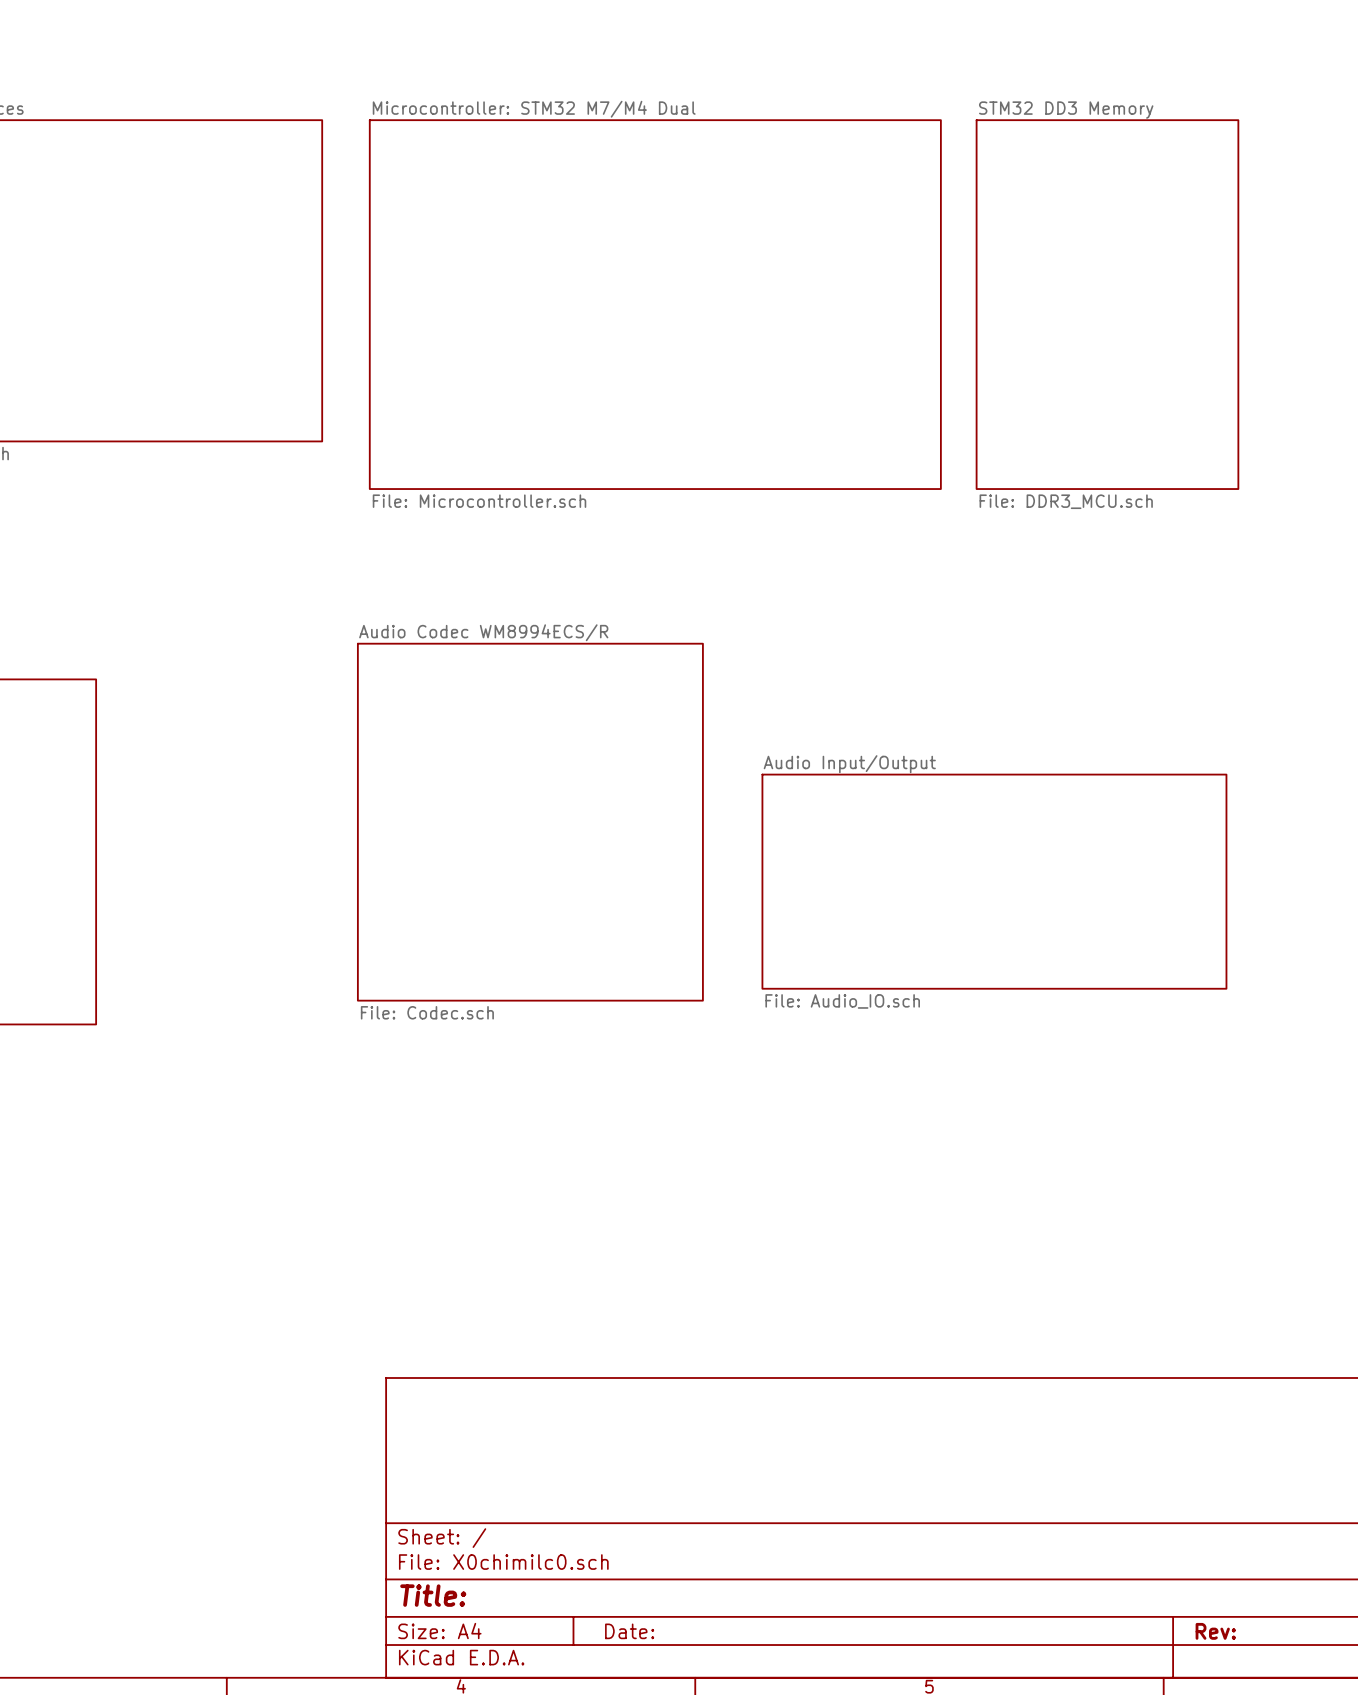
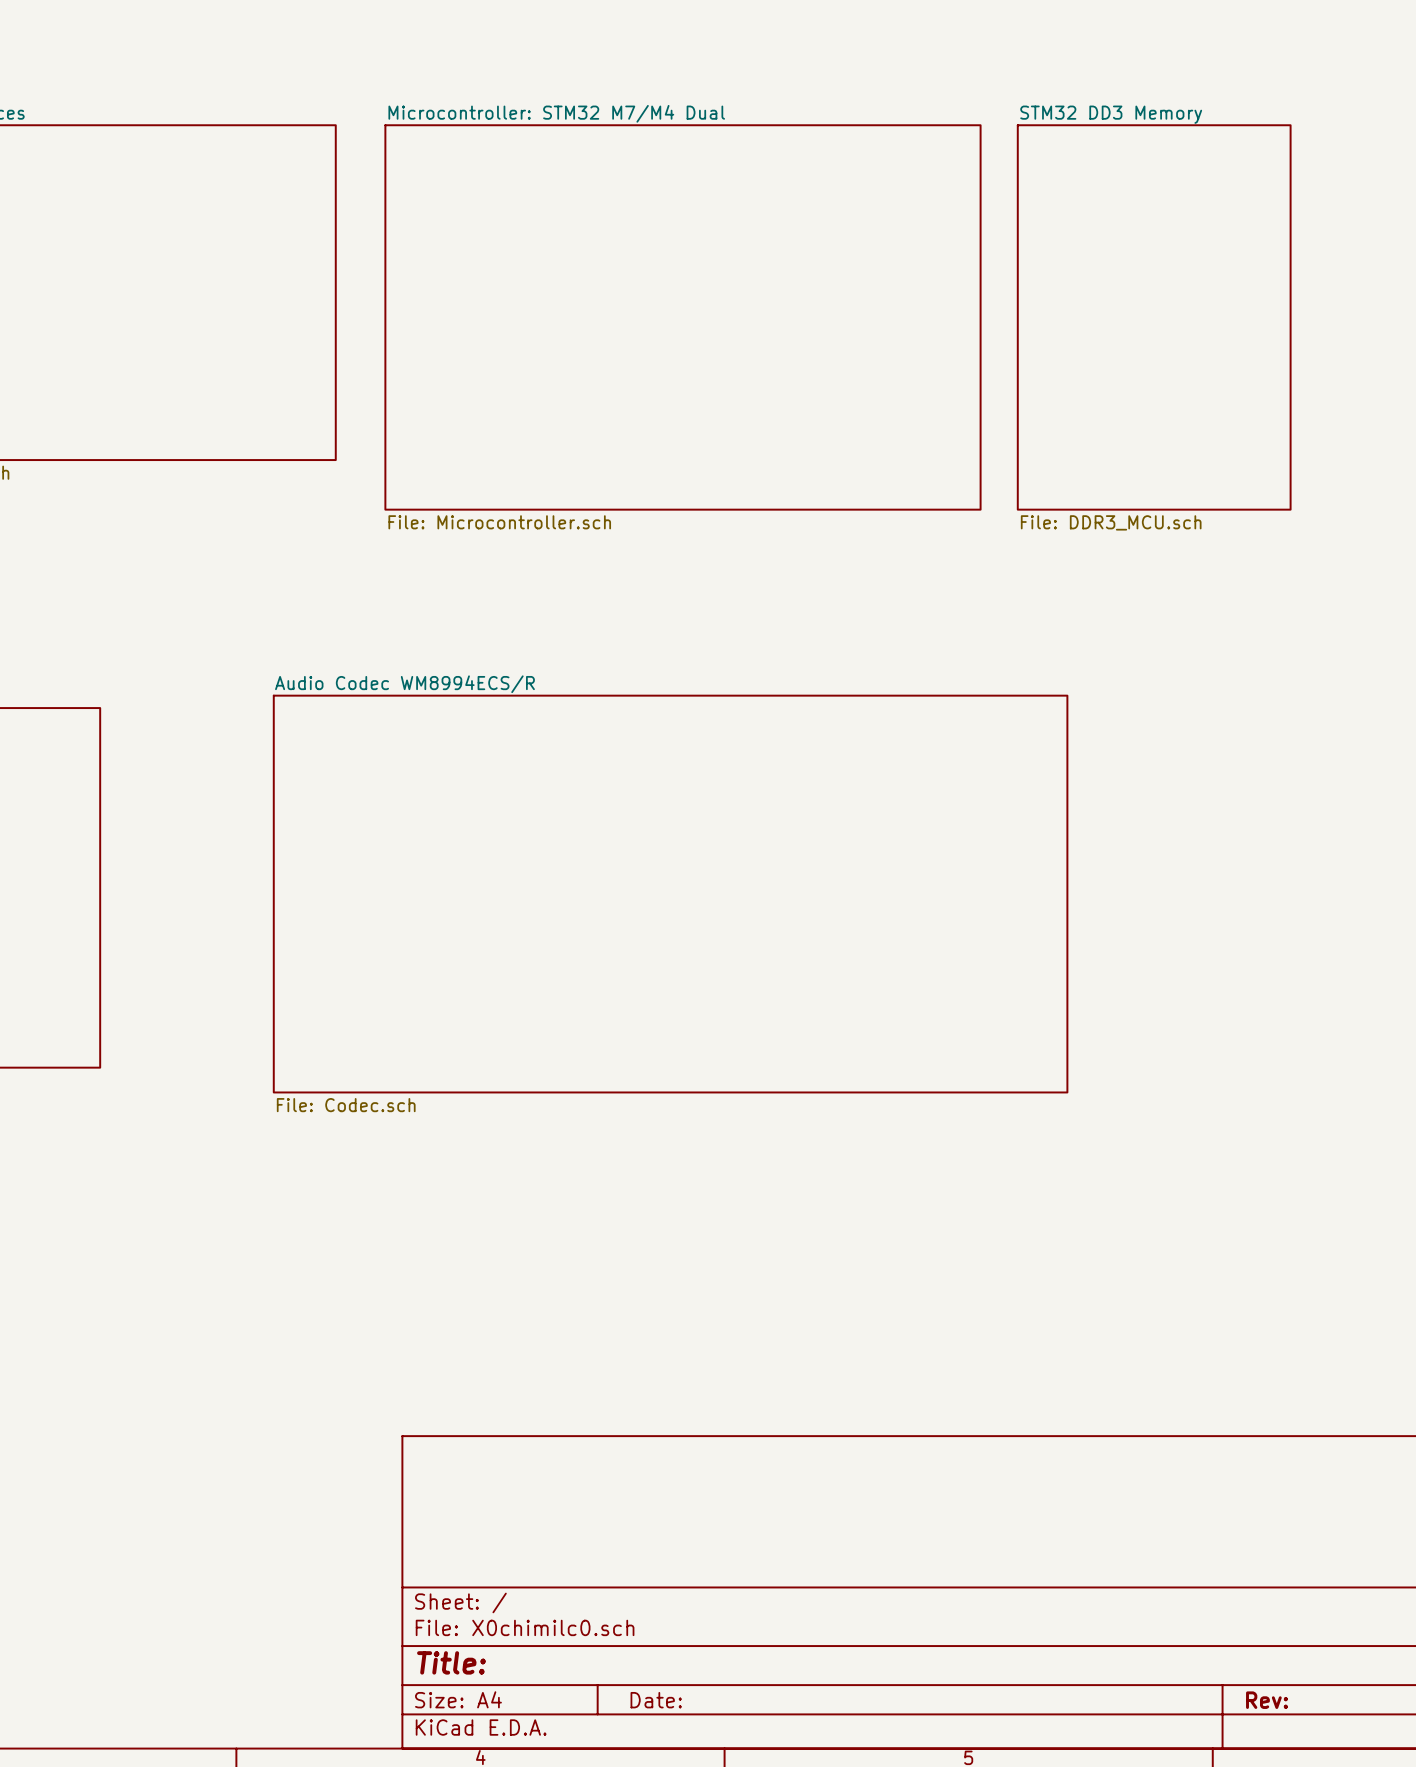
sheet Audio Codec WM8994ECS/R name position: Audio Codec WM8994ECS/R (483, 632) -> Audio Codec WM8994ECS/R (404, 684)
sheet Audio Codec WM8994ECS/R shape: [357, 643, 703, 1001] -> [273, 695, 1068, 1093]
sheet Audio Input/Output: File: Audio_IO.sch (994, 881) -> none
sheet Audio Codec WM8994ECS/R value position: File: Codec.sch (427, 1012) -> File: Codec.sch (346, 1105)

